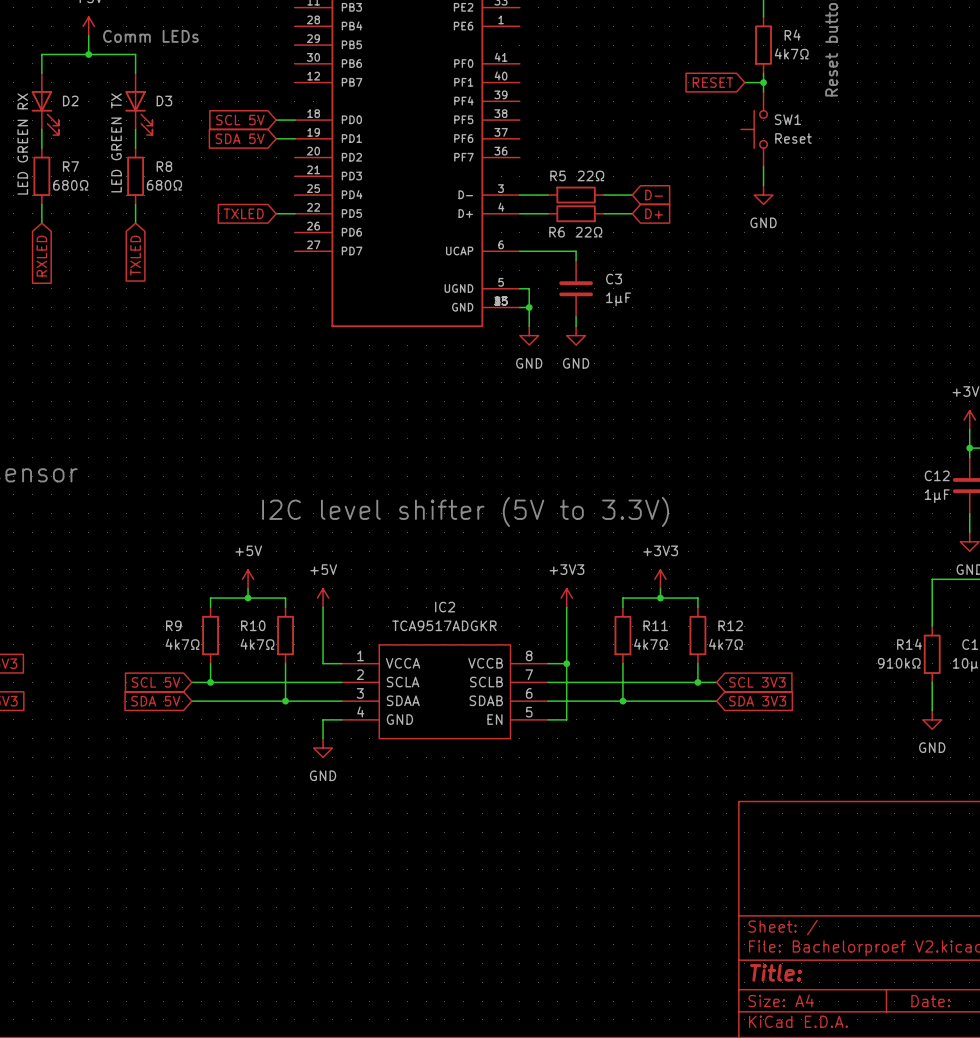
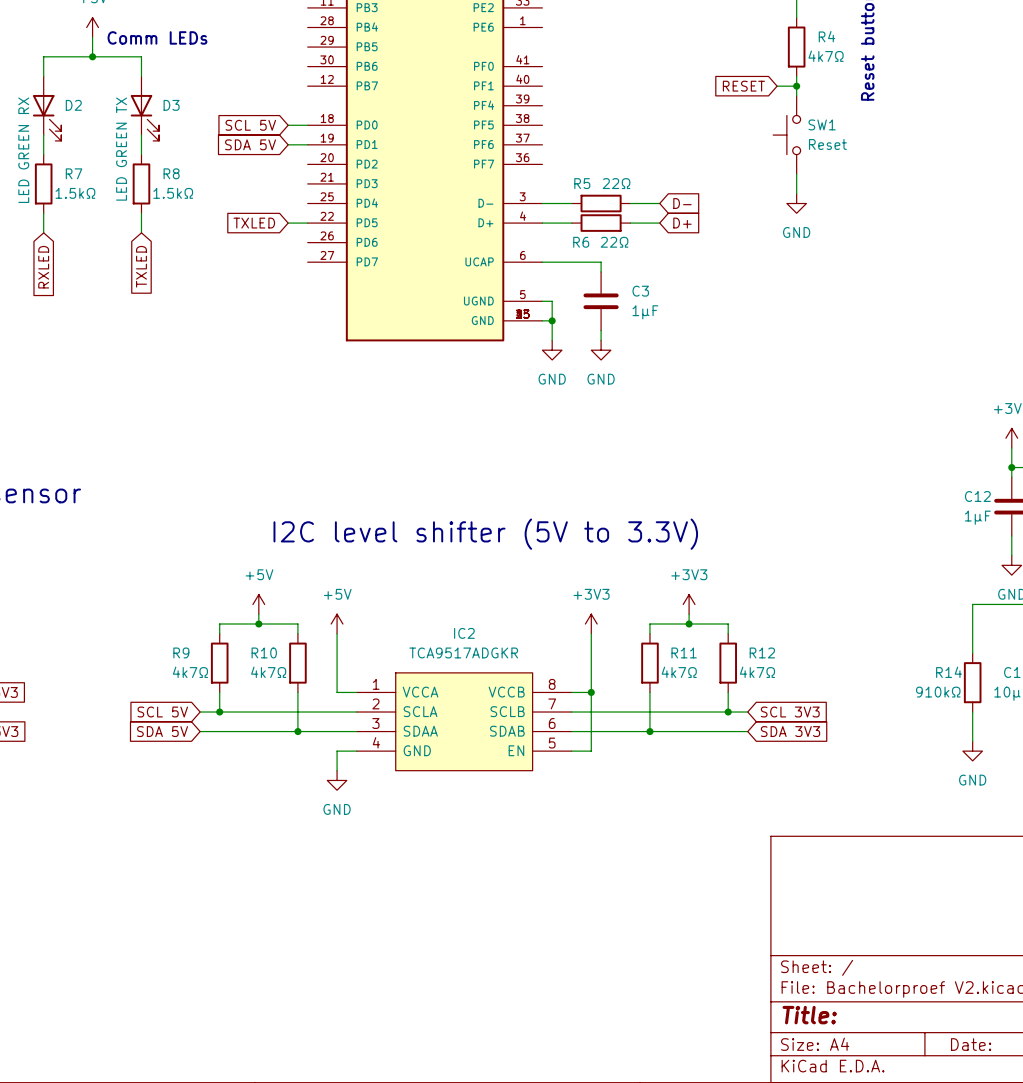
R7 value: 680Ω (70, 185) -> 1.5kΩ (75, 193)
R8 value: 680Ω (164, 185) -> 1.5kΩ (173, 193)

